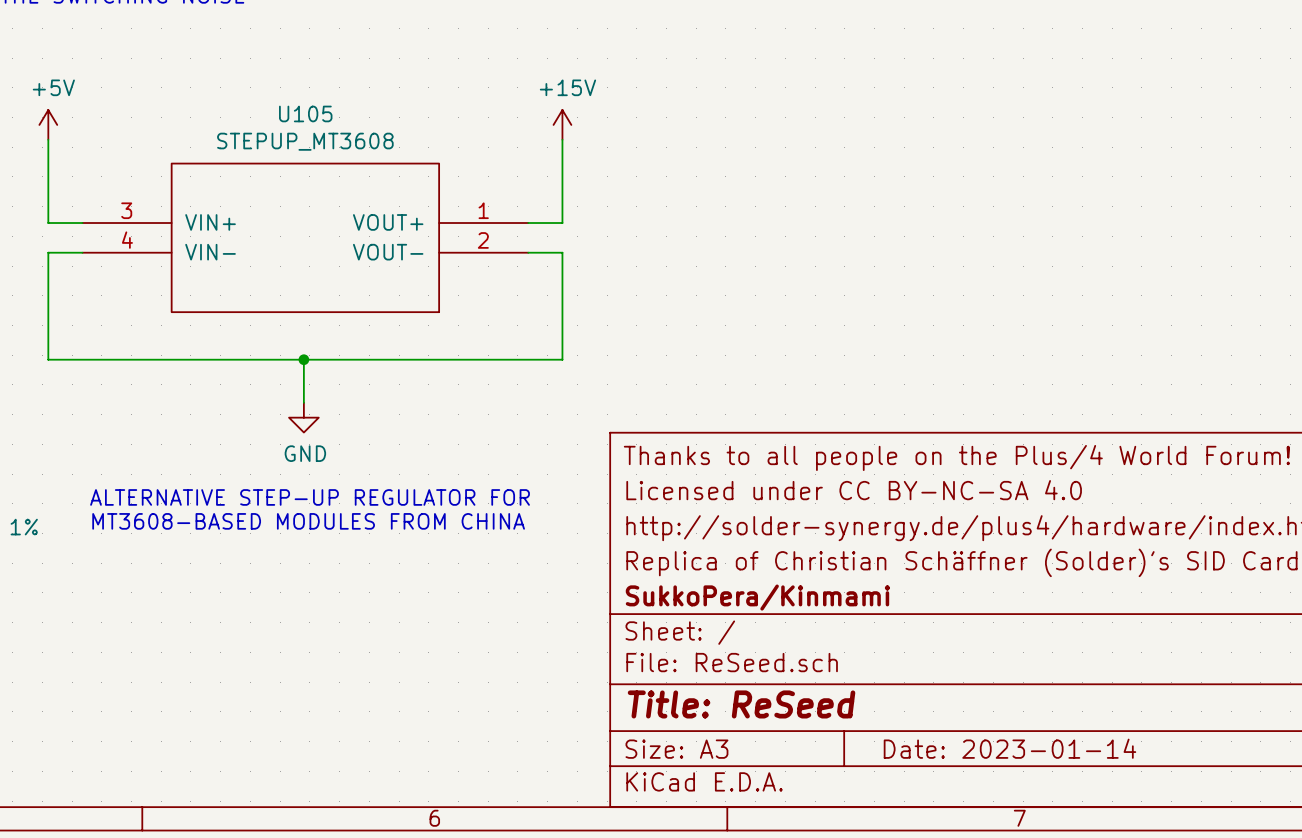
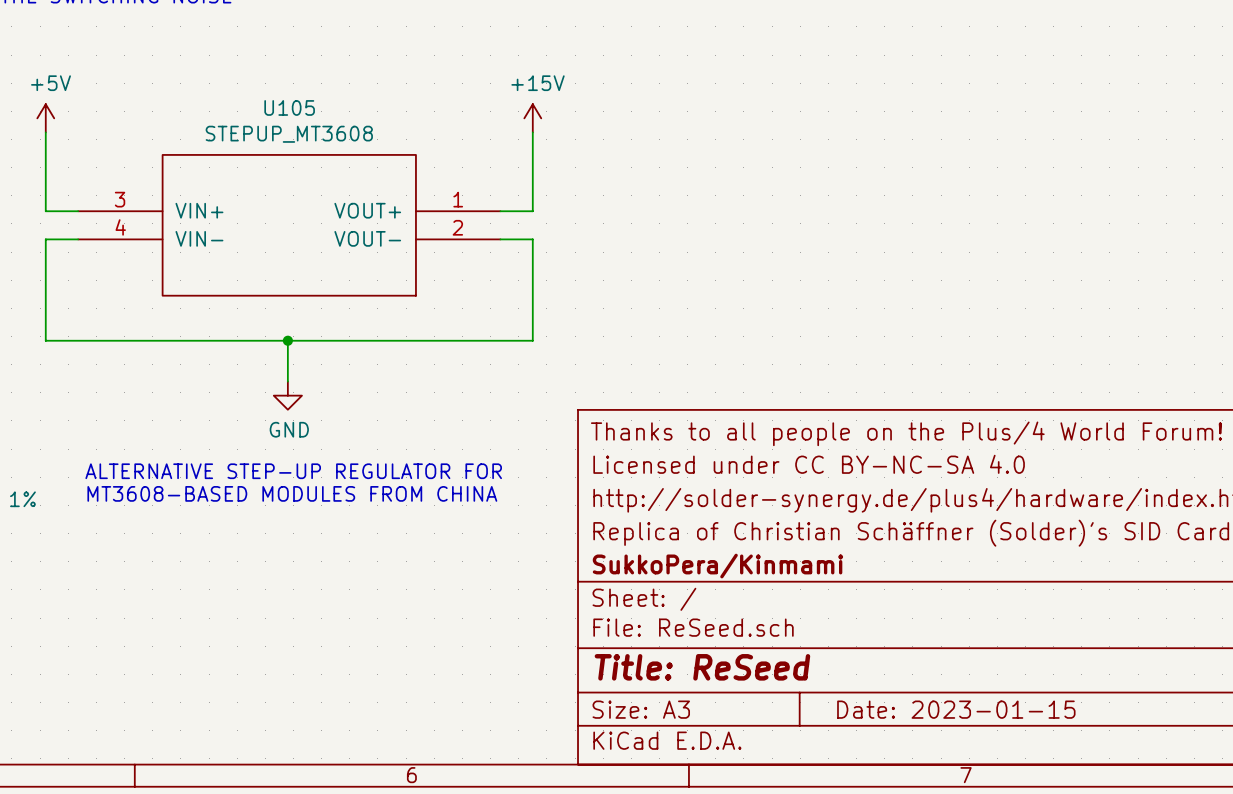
title block: Date: 2023-01-14 (1009, 748) -> Date: 2023-01-15 (956, 709)

